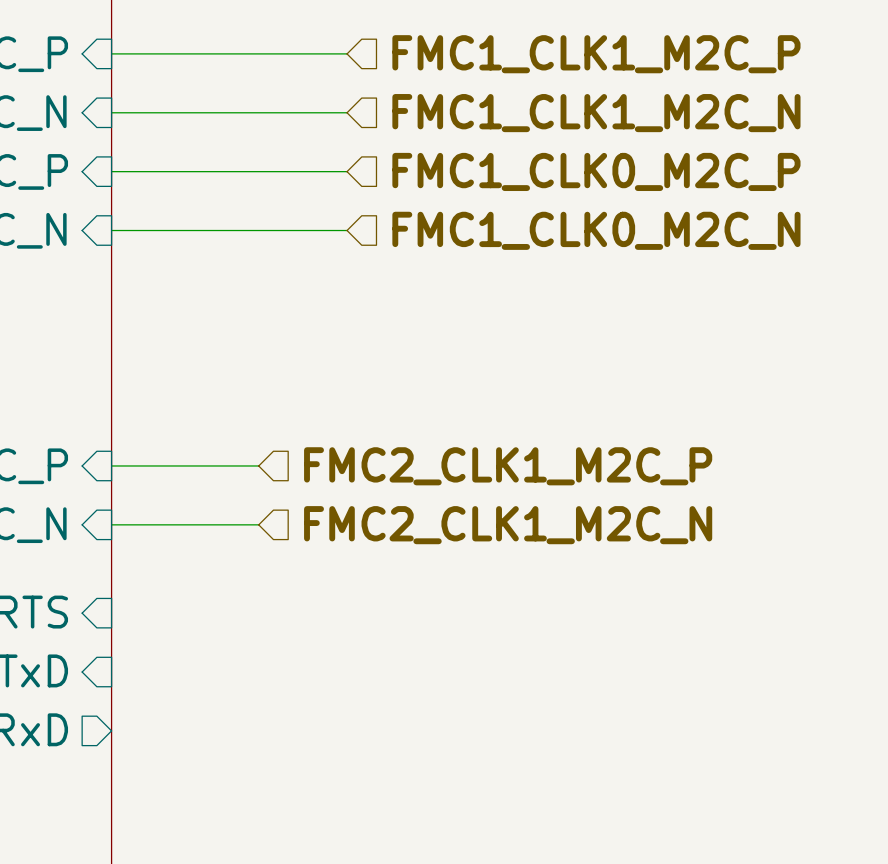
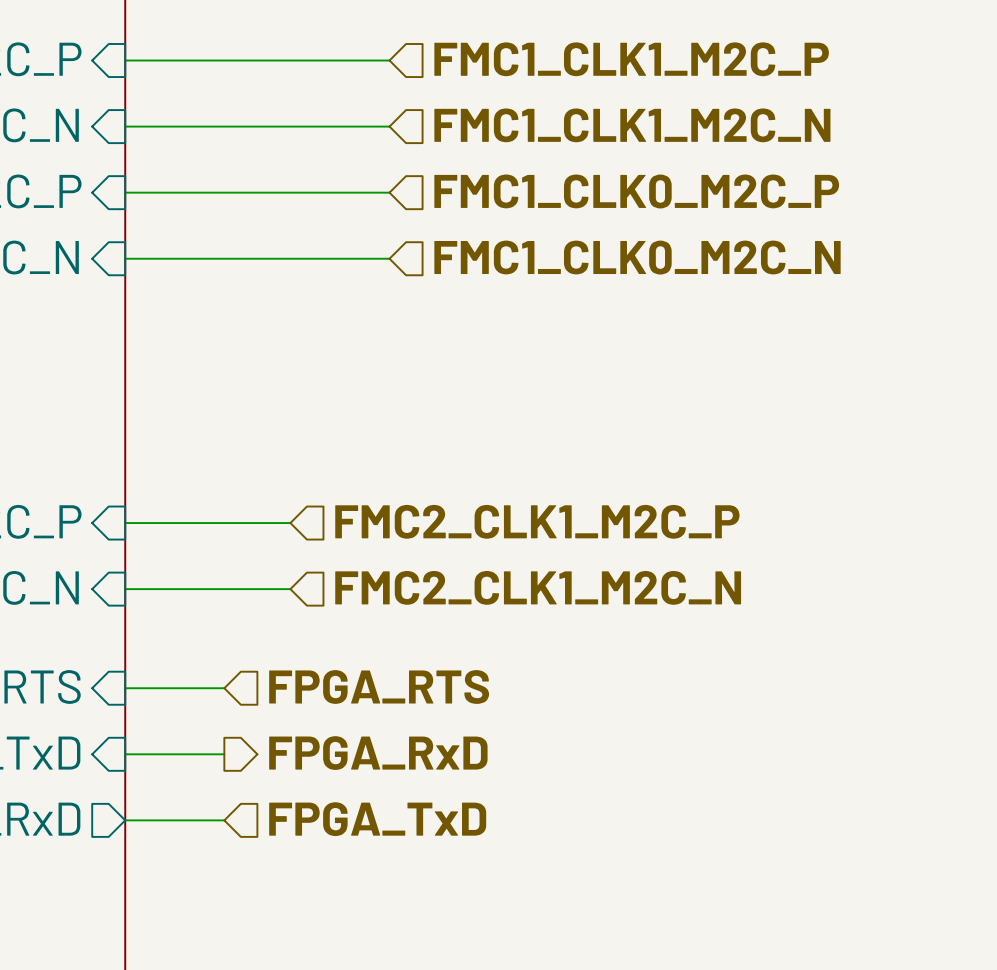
wire: none -> (125, 688) (224, 688)
hierarchical label: none -> FPGA_RTS (379, 686)
wire: none -> (125, 754) (224, 754)
hierarchical label: none -> FPGA_RxD (378, 753)
wire: none -> (125, 820) (224, 820)
hierarchical label: none -> FPGA_TxD (377, 819)

